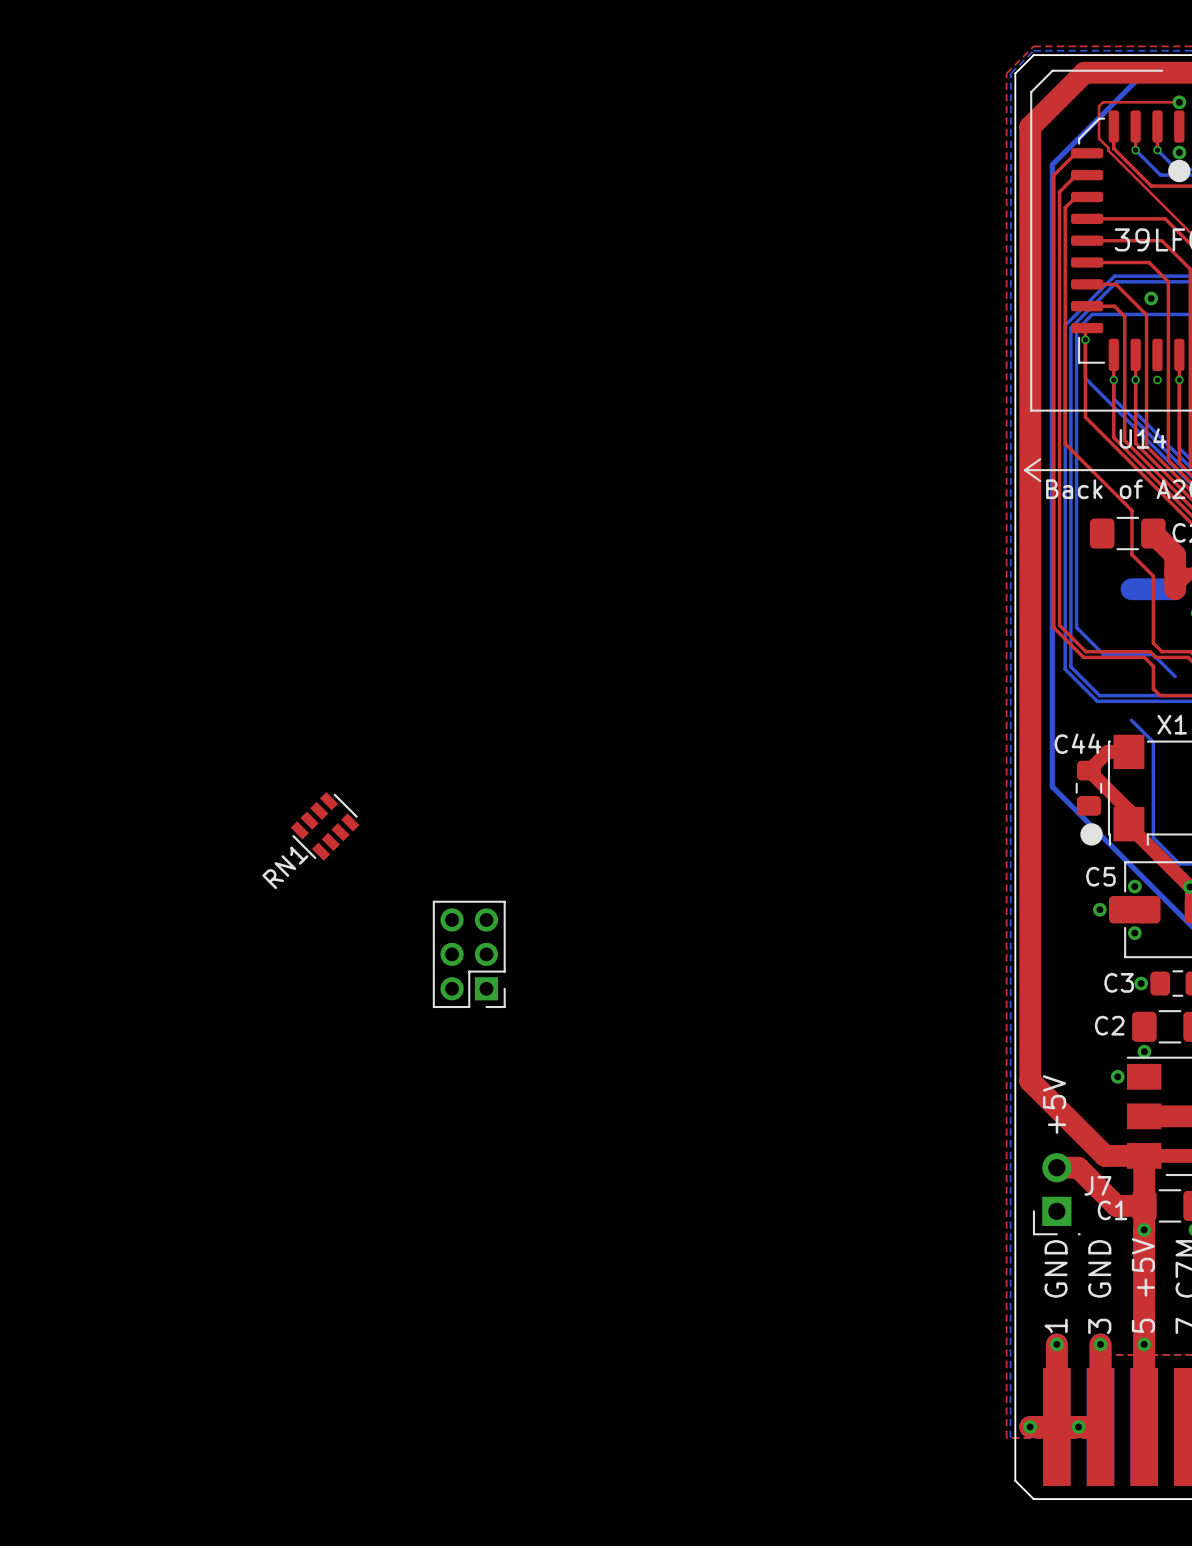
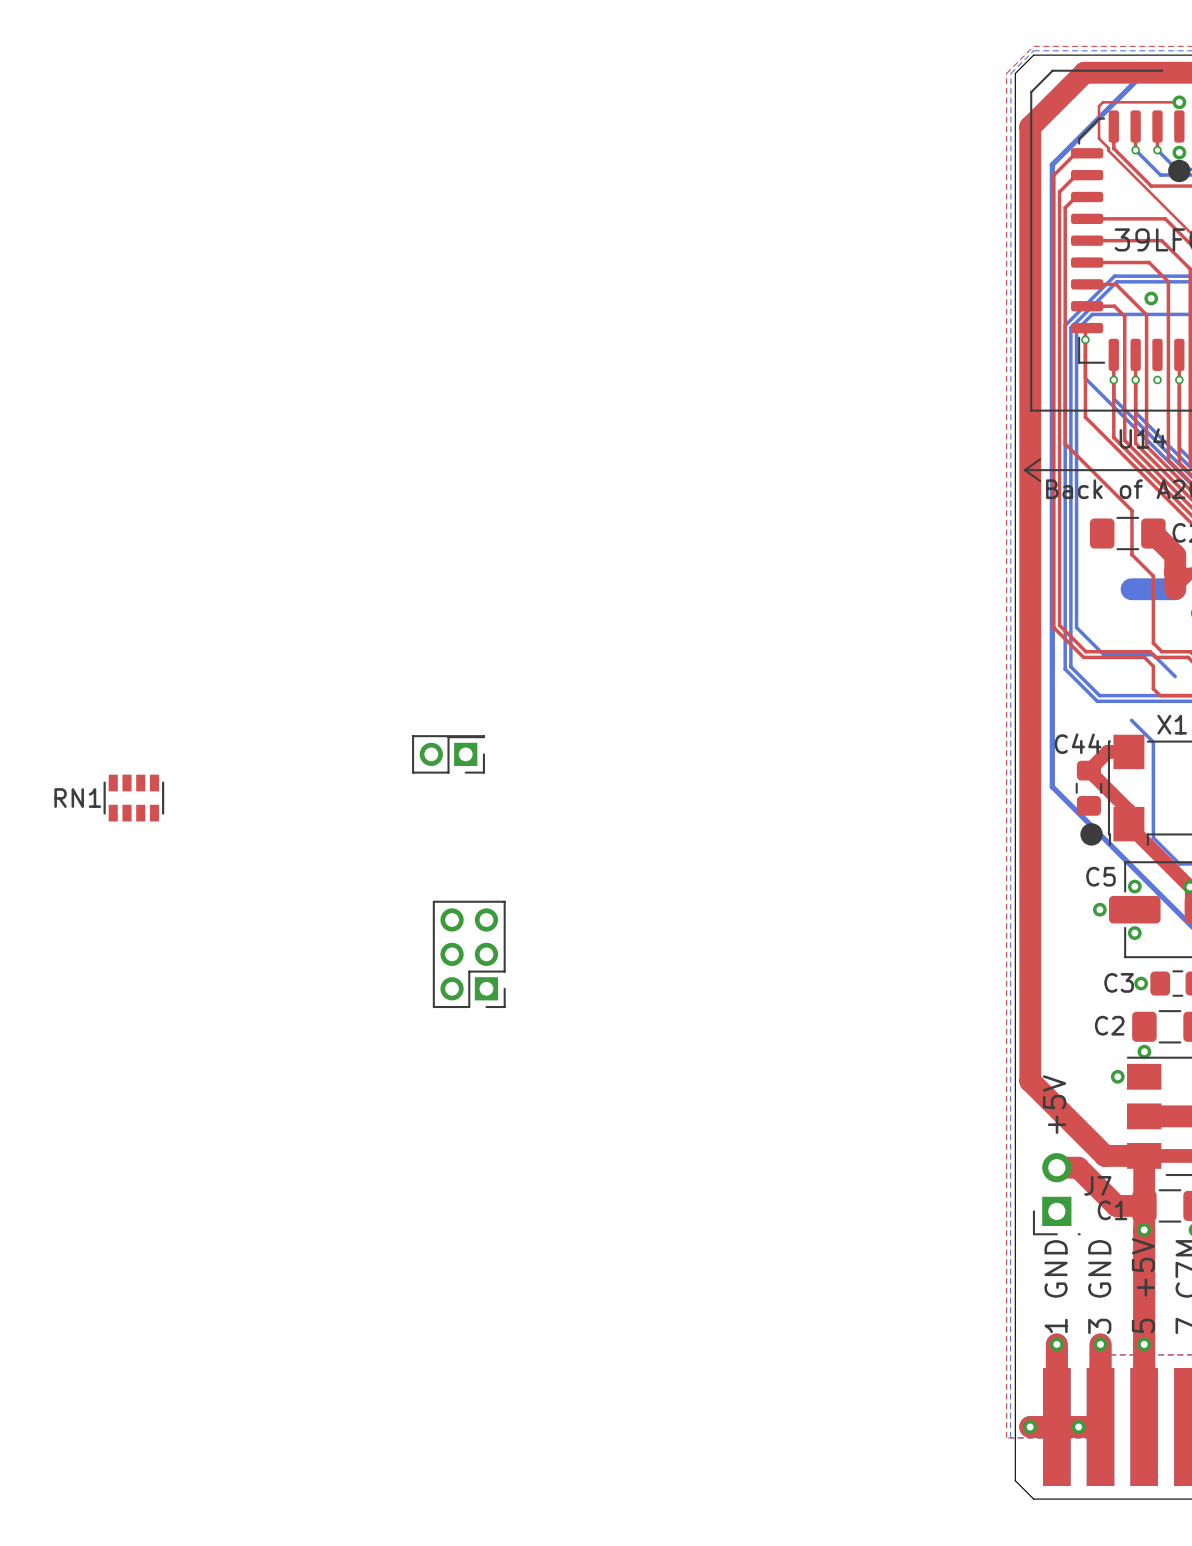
part: none -> (448, 754)
RN1 rotation: 0° (325, 826) -> 45° clockwise (133, 798)
RN1 position: (325, 826) -> (133, 798)

